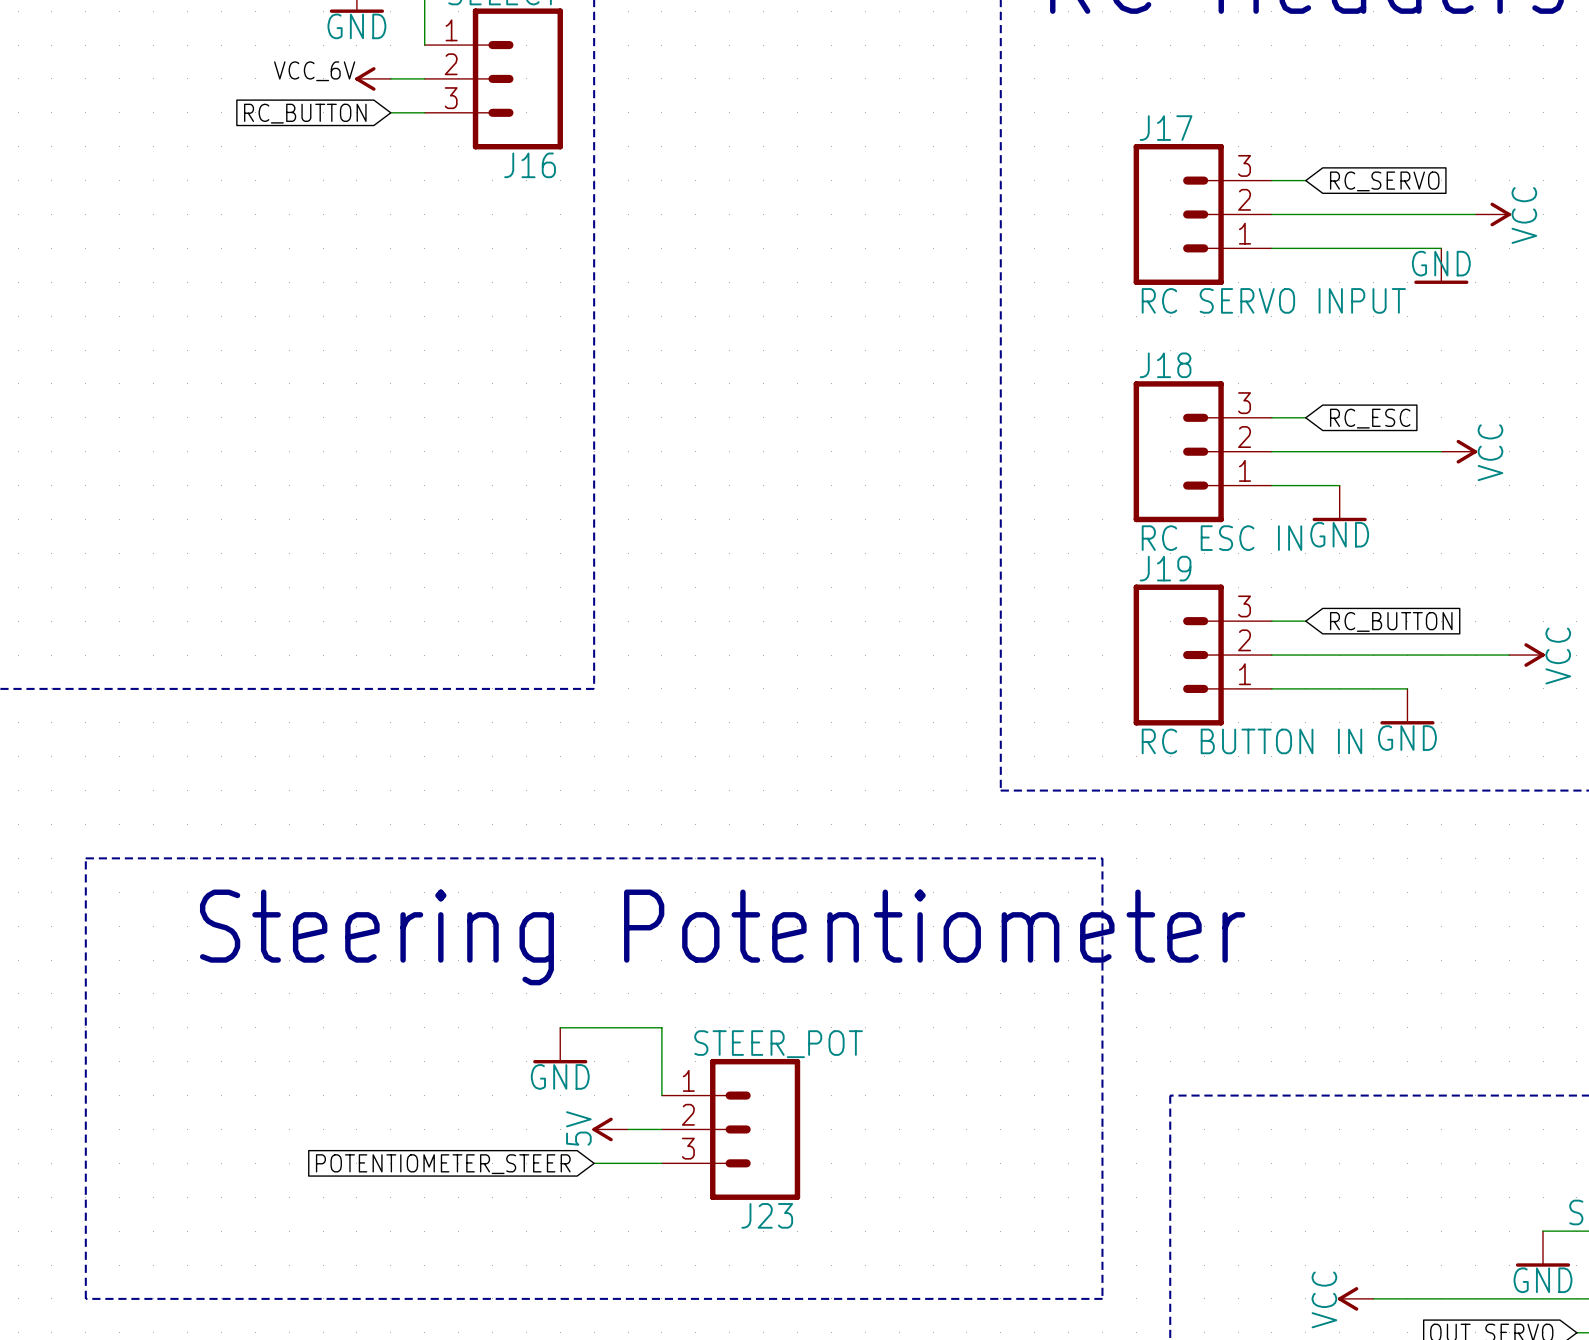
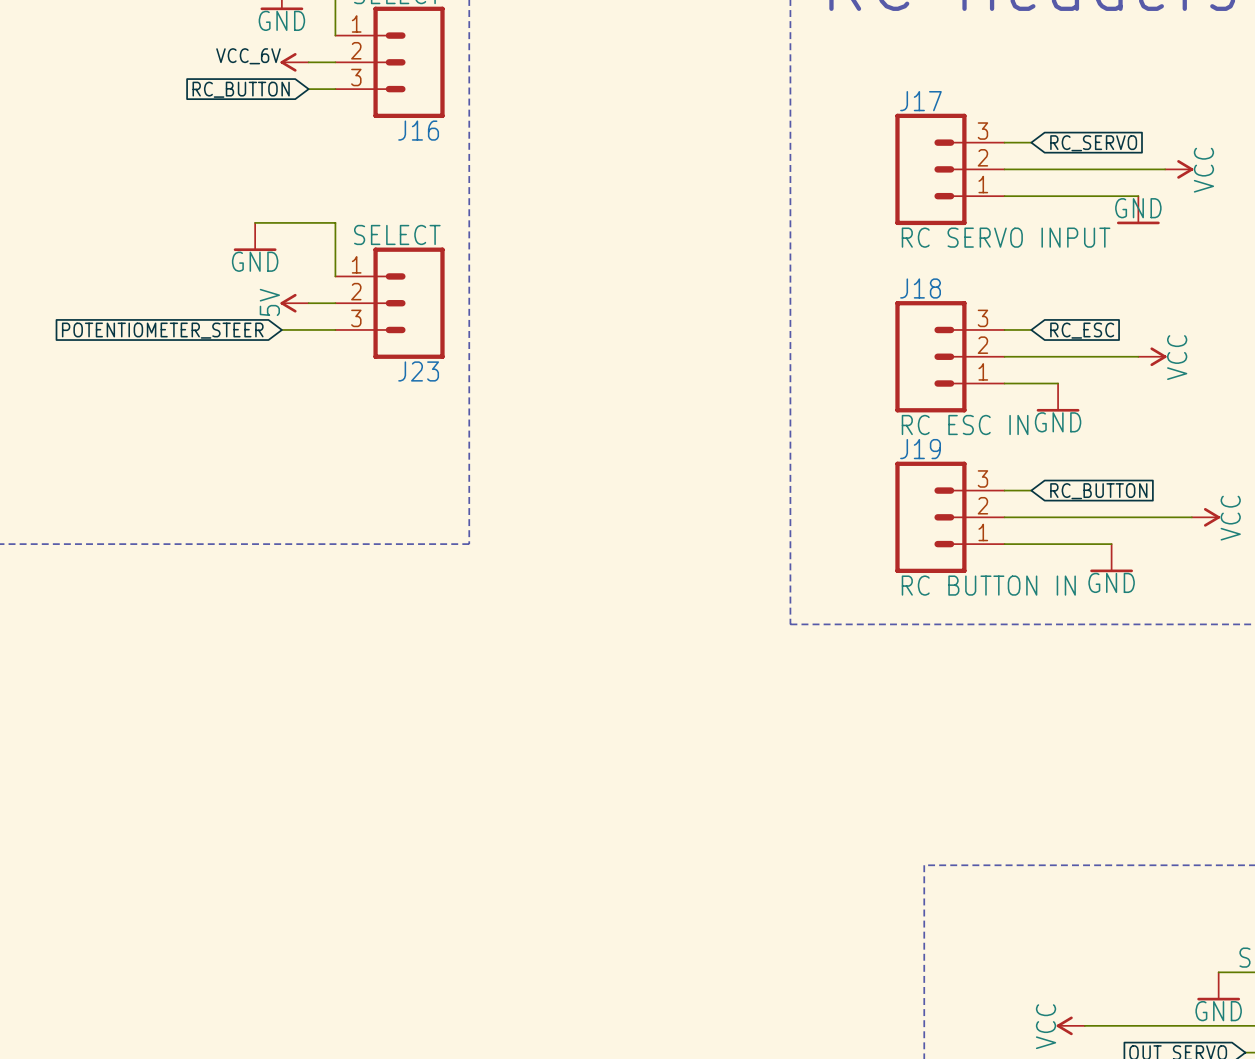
wire: none -> (255, 222) (335, 222) (335, 276)
power symbol: none -> GND (255, 236)
power symbol: none -> 5V (294, 303)
wire: none -> (308, 303) (335, 303)
wire: none -> (281, 329) (335, 329)
global label: none -> POTENTIOMETER_STEER (162, 330)
line: (85, 858) (85, 1298) (1102, 1298) (1102, 858) (85, 858) -> none
text: Steering Potentiometer (722, 937) -> none
wire: (560, 1027) (661, 1027) (661, 1095) -> none
J23 value: STEER_POT (778, 1044) -> SELECT (397, 234)
power symbol: GND (560, 1045) -> none
power symbol: 5V (610, 1129) -> none
wire: (628, 1129) (661, 1129) -> none
J23 position: (731, 1129) -> (390, 303)
wire: (594, 1163) (661, 1163) -> none
global label: POTENTIOMETER_STEER (443, 1164) -> none

